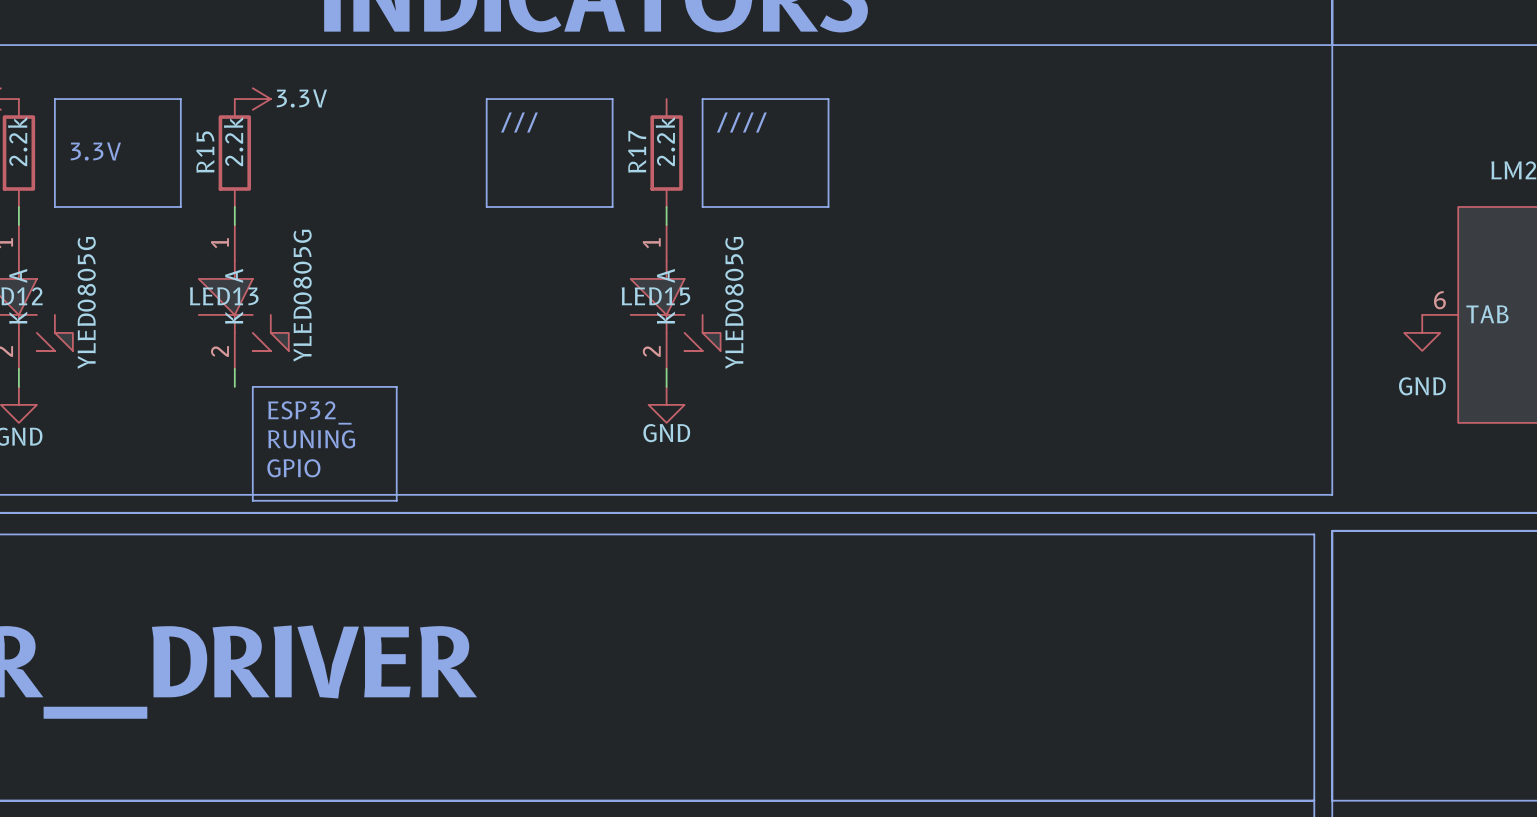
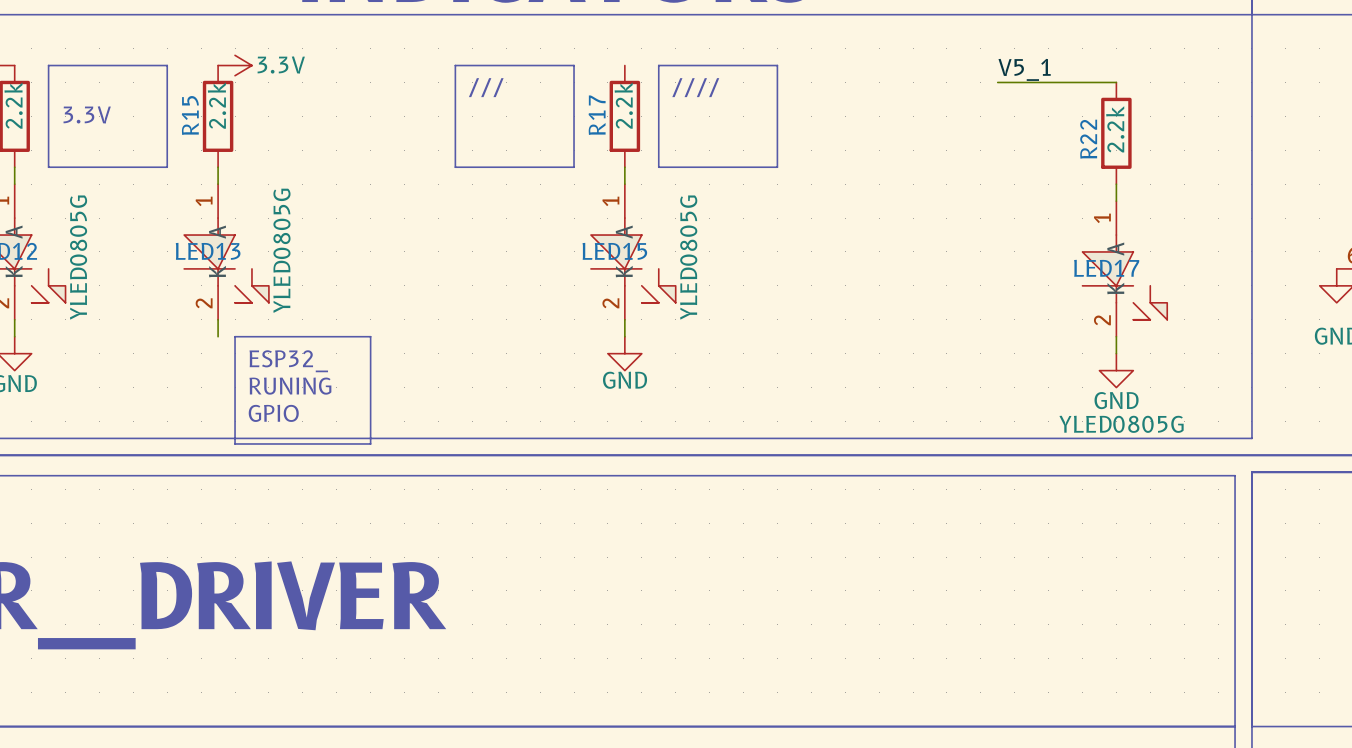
label: none -> V5_1 (1024, 69)
wire: none -> (997, 82) (1116, 82)
R22: none -> 2.2k (1116, 133)
wire: none -> (1116, 184) (1116, 201)
LED17: none -> YLED0805G (1124, 268)
wire: none -> (1116, 336) (1116, 353)
power symbol: none -> GND (1116, 370)

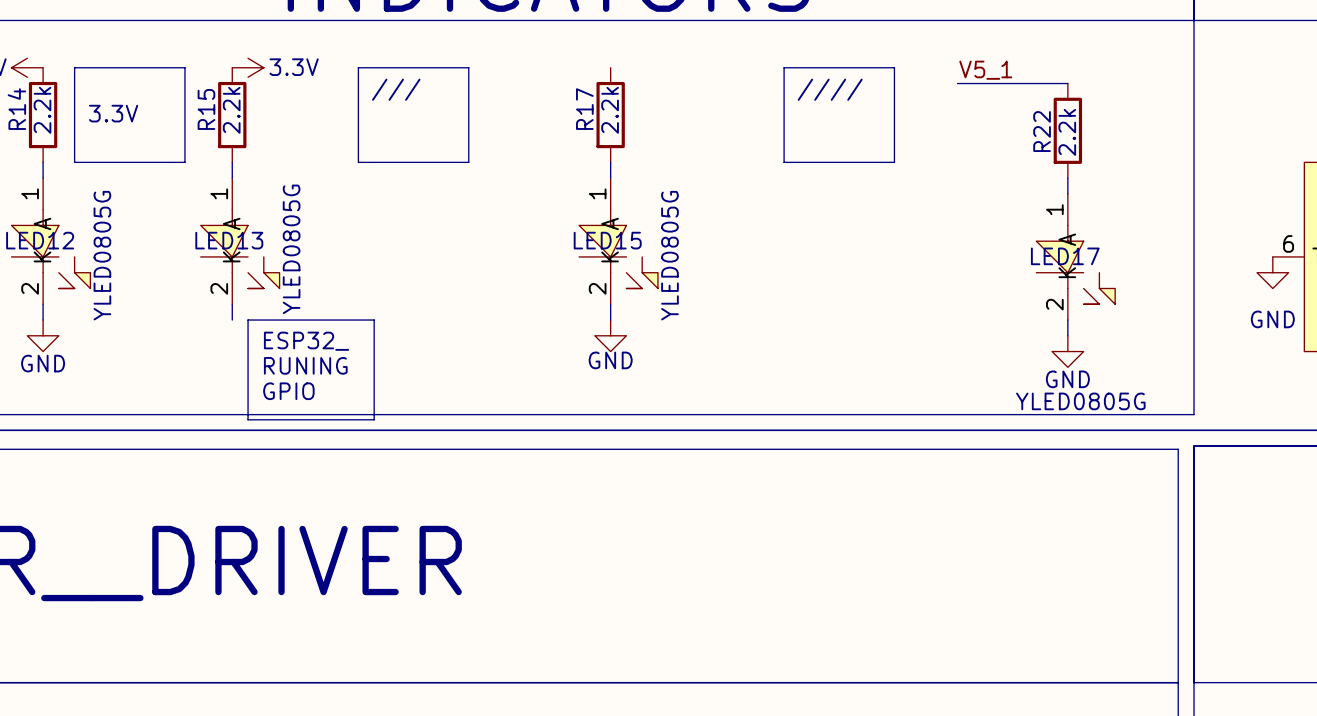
line: (455, 65) (455, 167) -> (453, 67) (358, 67) (358, 162) (453, 162)
line: (472, 65) (574, 65) (574, 167) (472, 167) -> (468, 67) (468, 162)
line: (658, 65) (777, 65) (777, 167) (658, 167) (658, 65) -> (784, 67) (894, 67) (894, 162) (784, 162) (784, 67)
text position: /// (486, 87) -> /// (396, 89)
text position: //// (695, 87) -> //// (830, 89)

